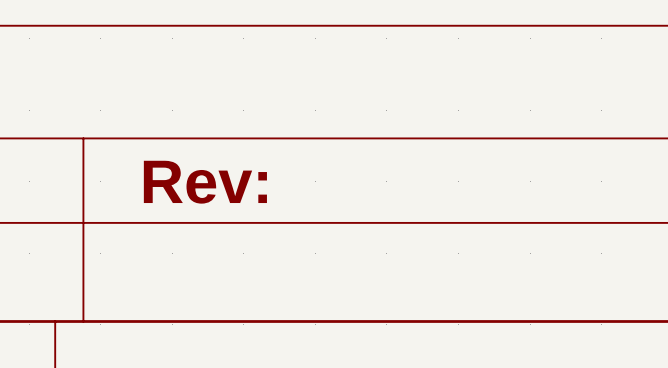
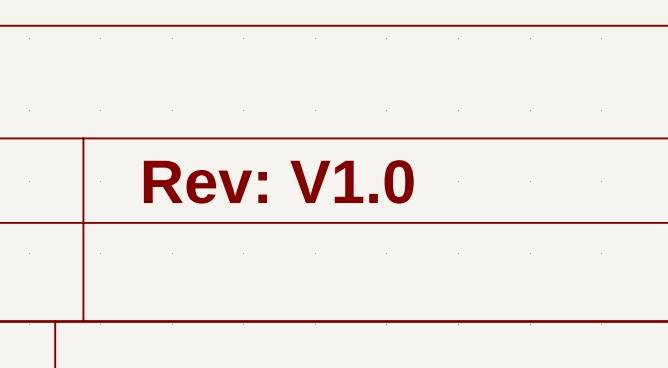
title block: Rev: (205, 182) -> Rev: V1.0 (278, 181)

